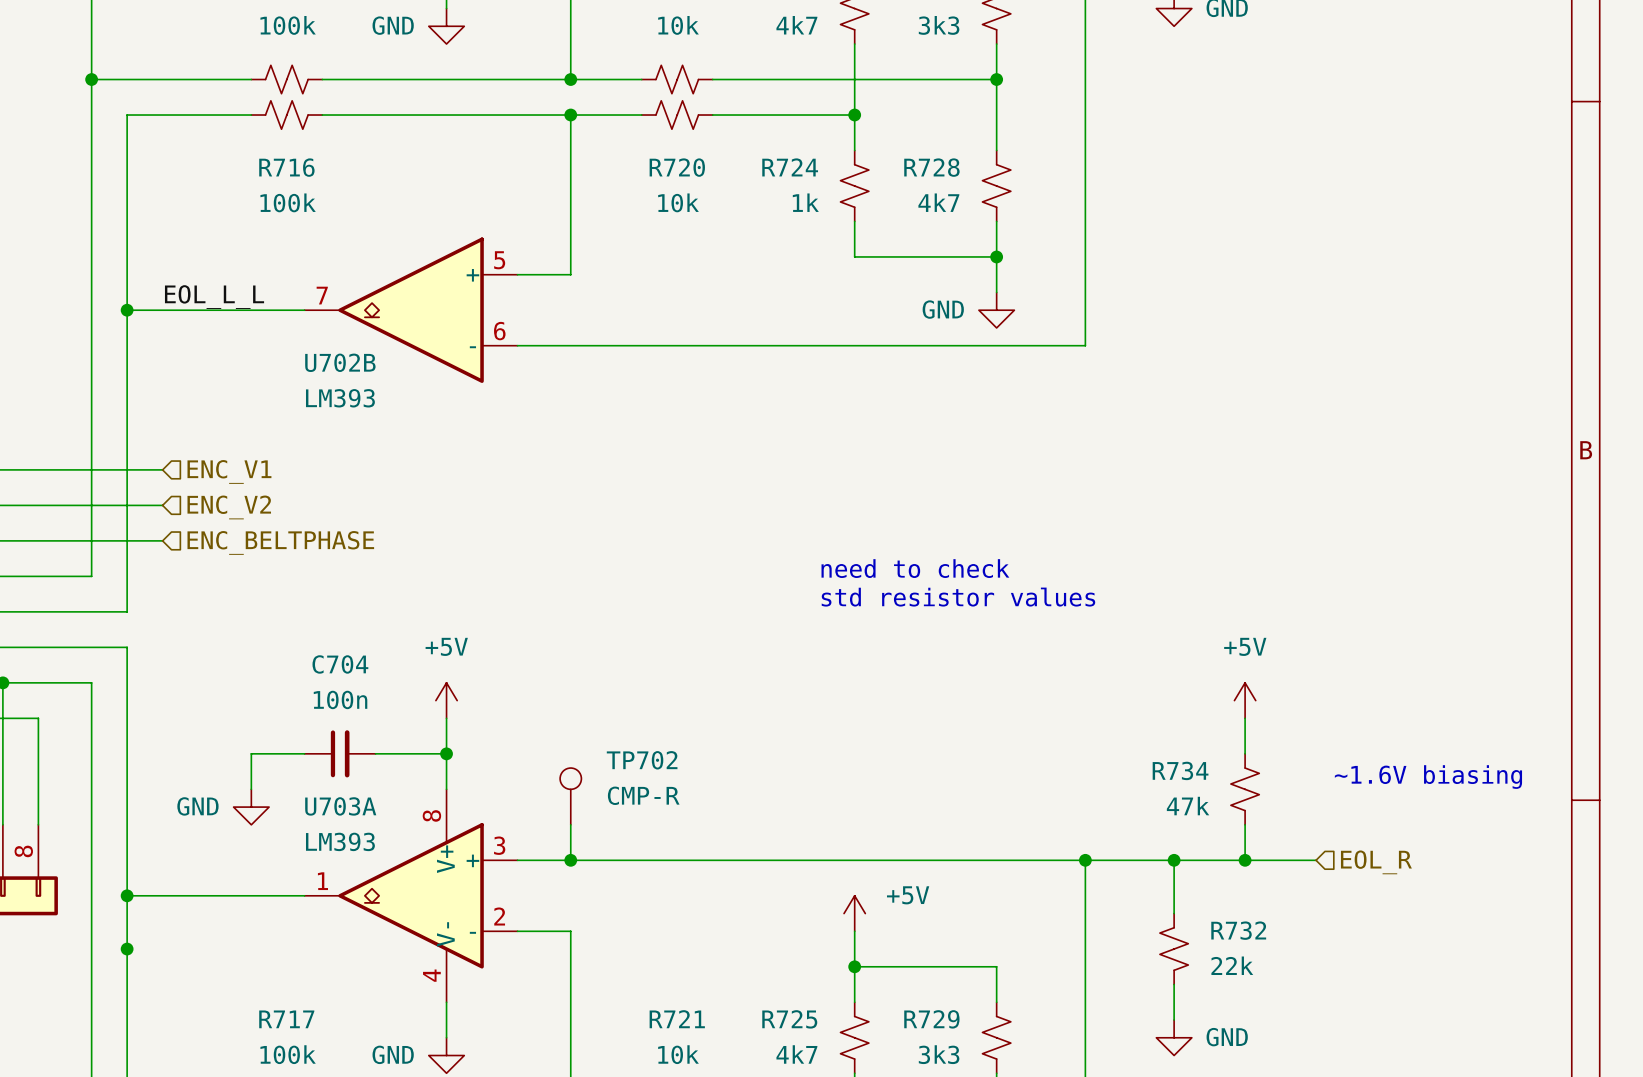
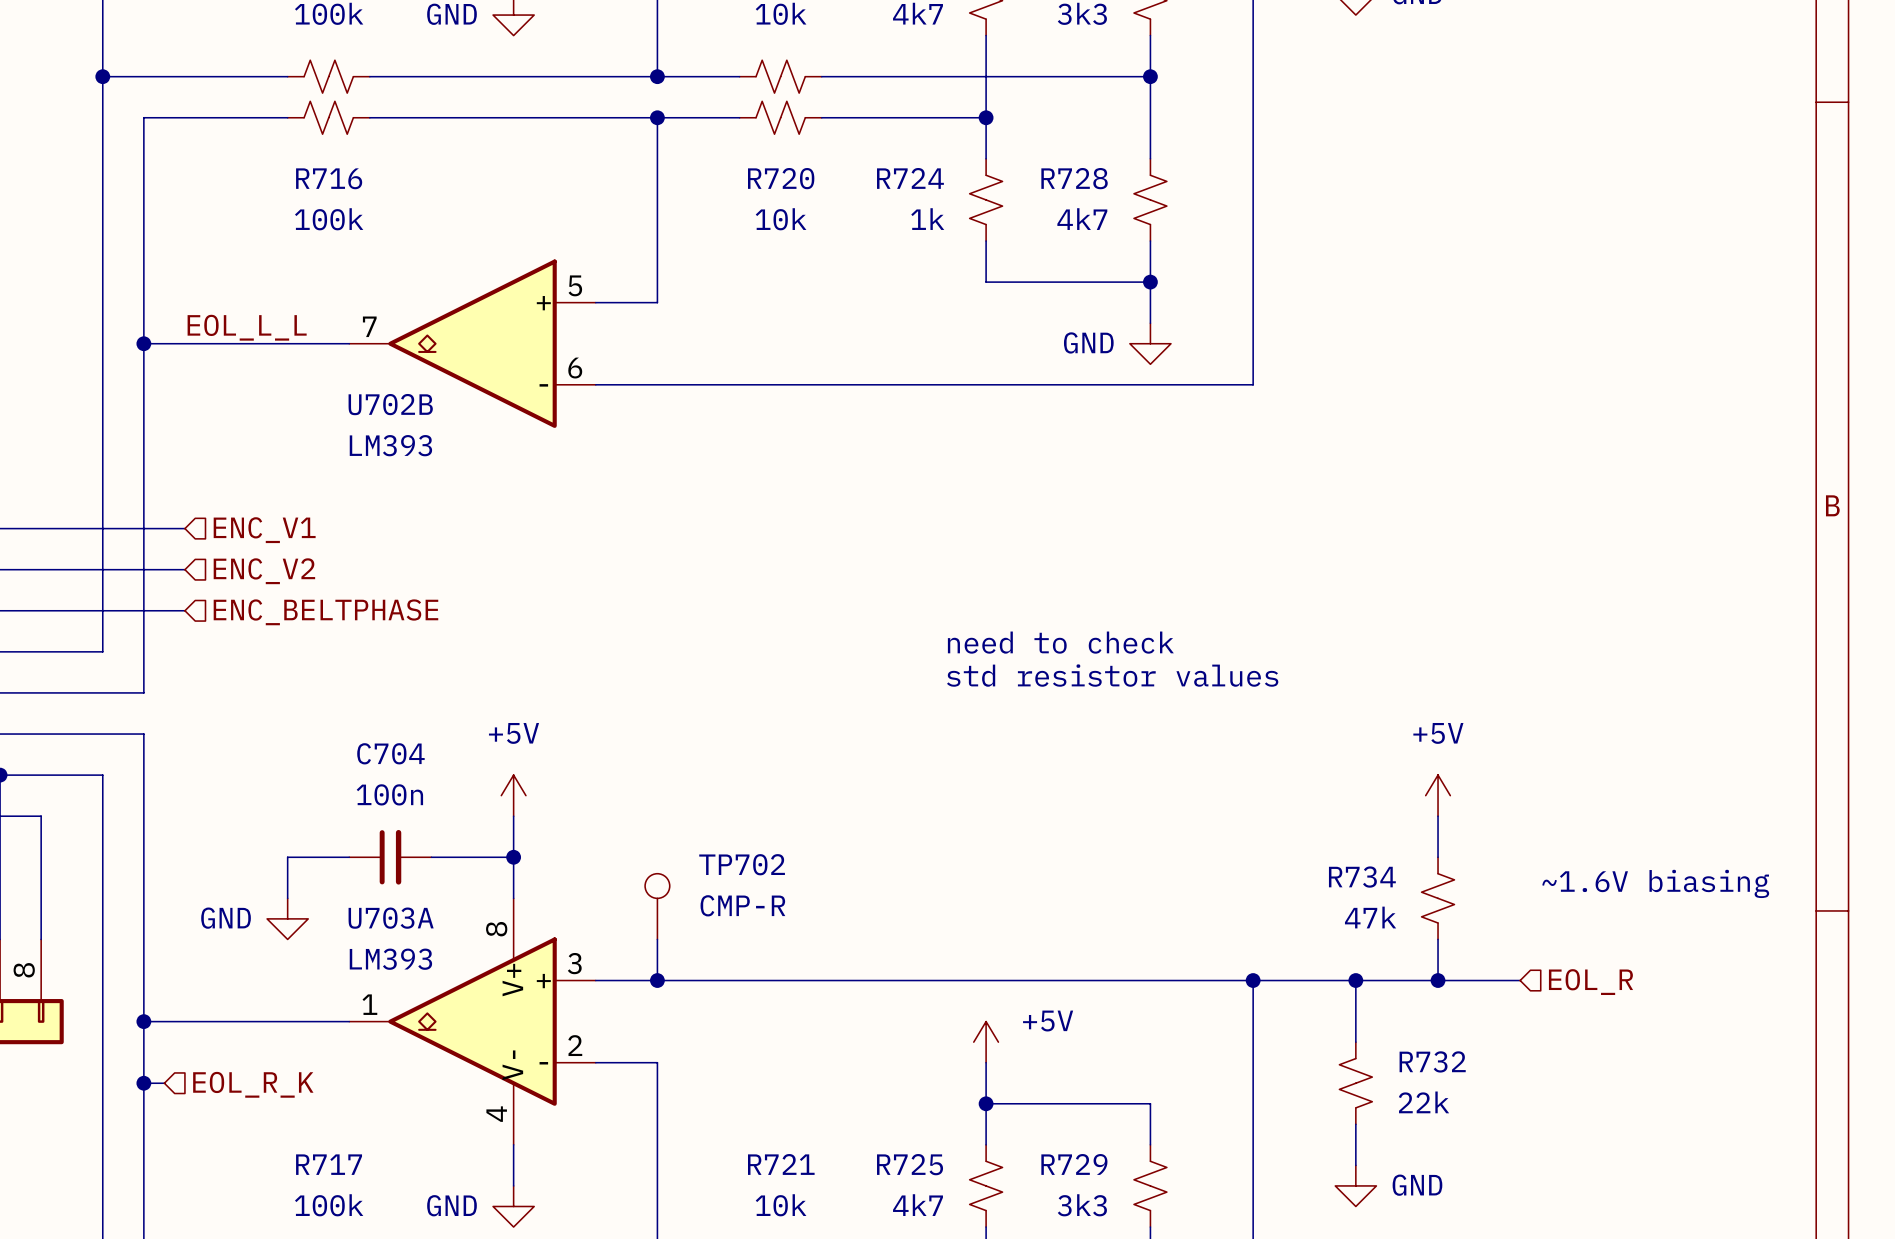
wire: none -> (143, 1083) (164, 1083)
hierarchical label: none -> EOL_R_K (253, 1084)

